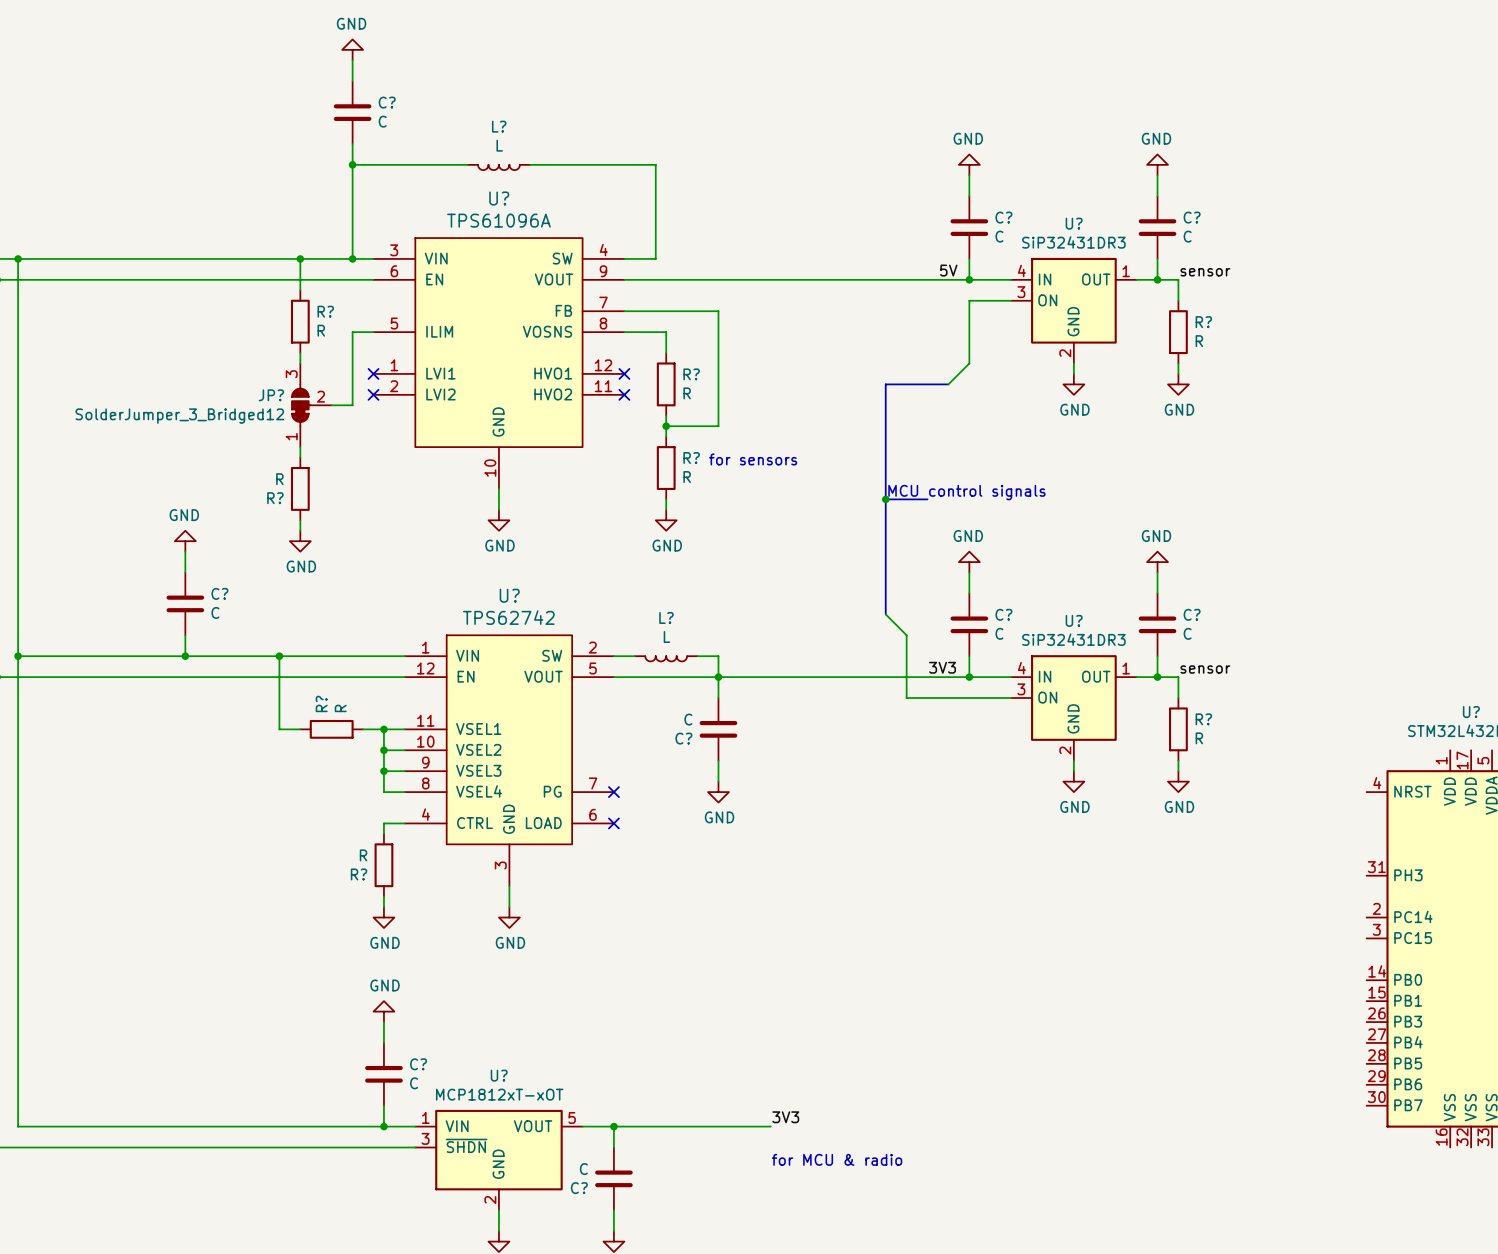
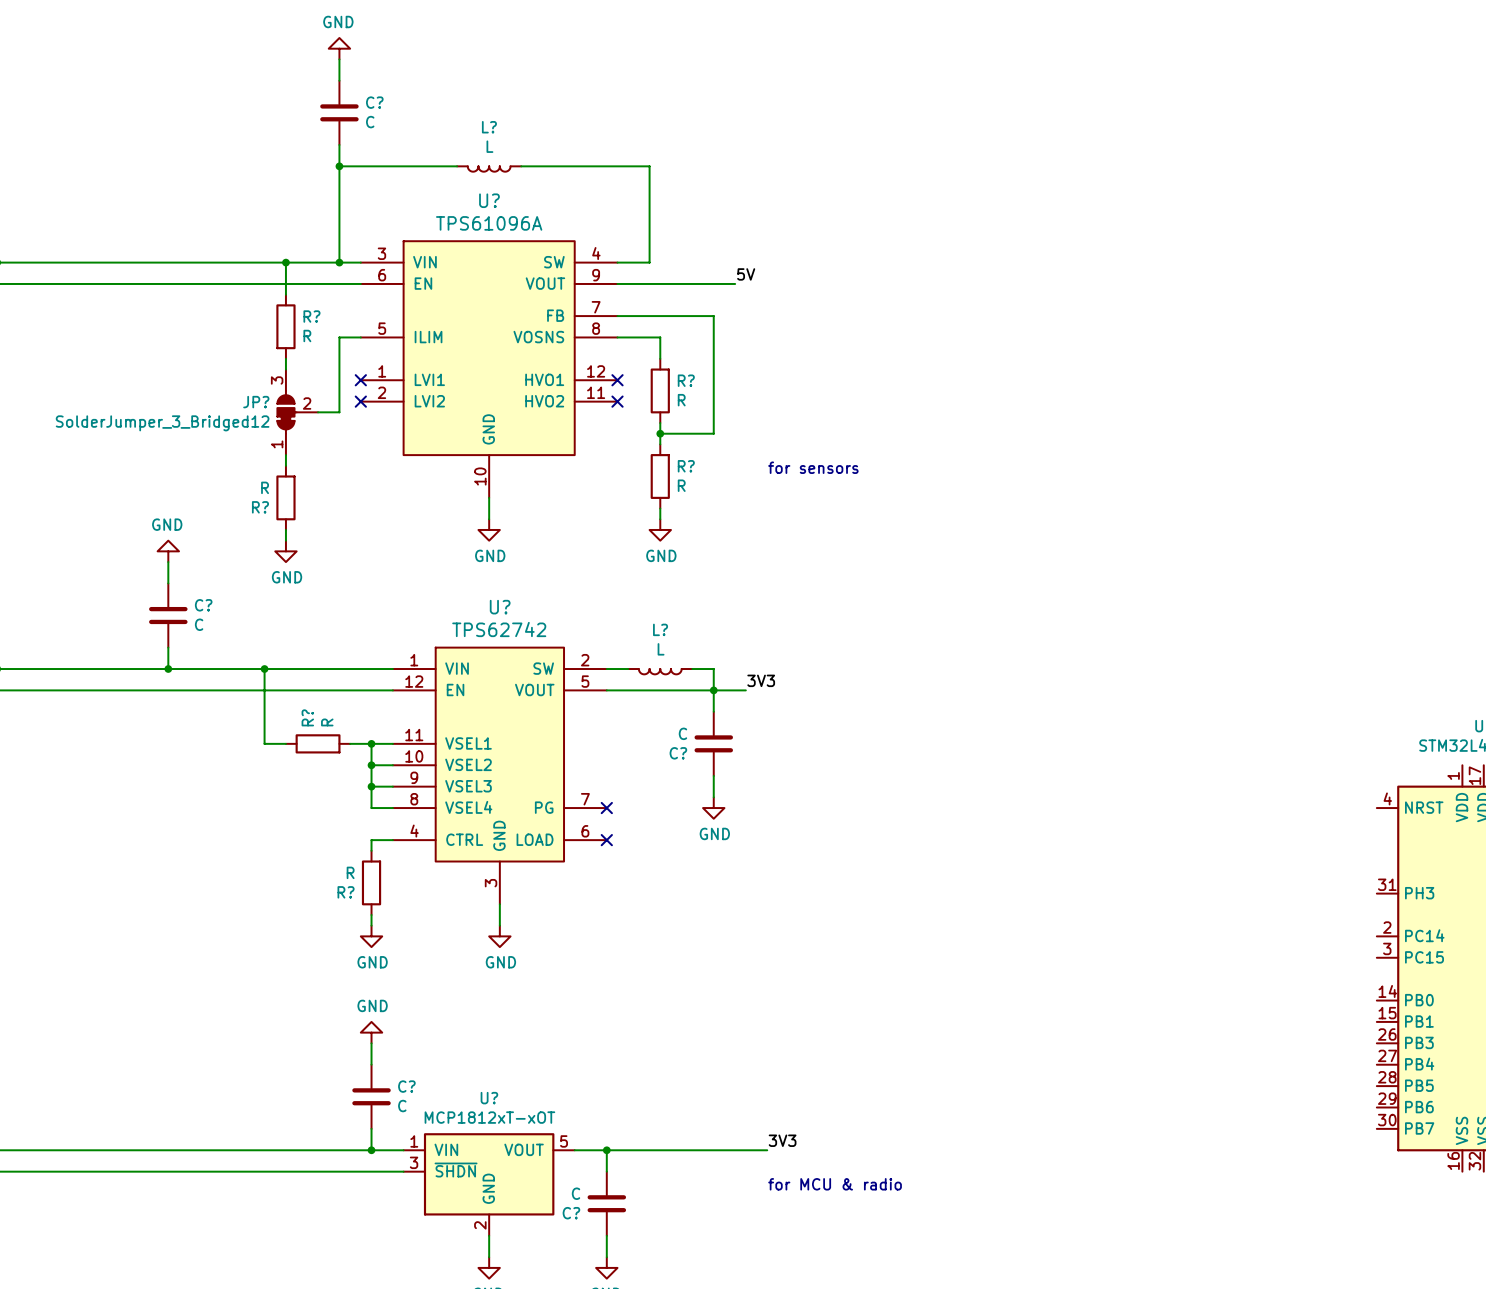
power symbol: GND (969, 164) -> none
power symbol: GND (1157, 164) -> none
wire: (969, 175) (969, 196) -> none
wire: (1157, 175) (1157, 196) -> none
C?: C (969, 227) -> none
C?: C (1157, 227) -> none
wire: (969, 258) (969, 279) -> none
wire: (1157, 258) (1157, 279) -> none
label position: 5V (948, 270) -> 5V (746, 274)
label: sensor (1205, 272) -> none
wire: (739, 279) (1011, 279) -> none
junction: (969, 279) -> none
wire: (1136, 279) (1178, 279) (1178, 300) -> none
junction: (1157, 279) -> none
wire: (1011, 300) (969, 300) (969, 363) (948, 384) -> none
U?: SiP32431DR3 (1073, 310) -> none
R?: R (1178, 332) -> none
wire: (1073, 363) (1073, 373) -> none
wire: (1178, 363) (1178, 373) -> none
bus: (948, 384) (885, 384) (885, 614) -> none
power symbol: GND (1073, 384) -> none
power symbol: GND (1178, 384) -> none
text position: for sensors (753, 459) -> for sensors (813, 467)
text: MCU control signals (966, 492) -> none
bus: (885, 499) (927, 499) -> none
junction: (885, 499) -> none
power symbol: GND (969, 562) -> none
power symbol: GND (1157, 562) -> none
wire: (969, 572) (969, 593) -> none
wire: (1157, 572) (1157, 593) -> none
wire: (885, 614) (906, 635) (906, 698) (1011, 698) -> none
C?: C (969, 624) -> none
C?: C (1157, 624) -> none
wire: (969, 656) (969, 677) -> none
wire: (1157, 656) (1157, 677) -> none
label position: 3V3 (942, 667) -> 3V3 (761, 680)
label: sensor (1205, 669) -> none
wire: (749, 677) (1011, 677) -> none
junction: (969, 677) -> none
wire: (1136, 677) (1178, 677) (1178, 698) -> none
junction: (1157, 677) -> none
U?: SiP32431DR3 (1073, 707) -> none
R?: R (1178, 729) -> none
wire: (1073, 760) (1073, 771) -> none
wire: (1178, 760) (1178, 771) -> none
power symbol: GND (1073, 781) -> none
power symbol: GND (1178, 781) -> none

